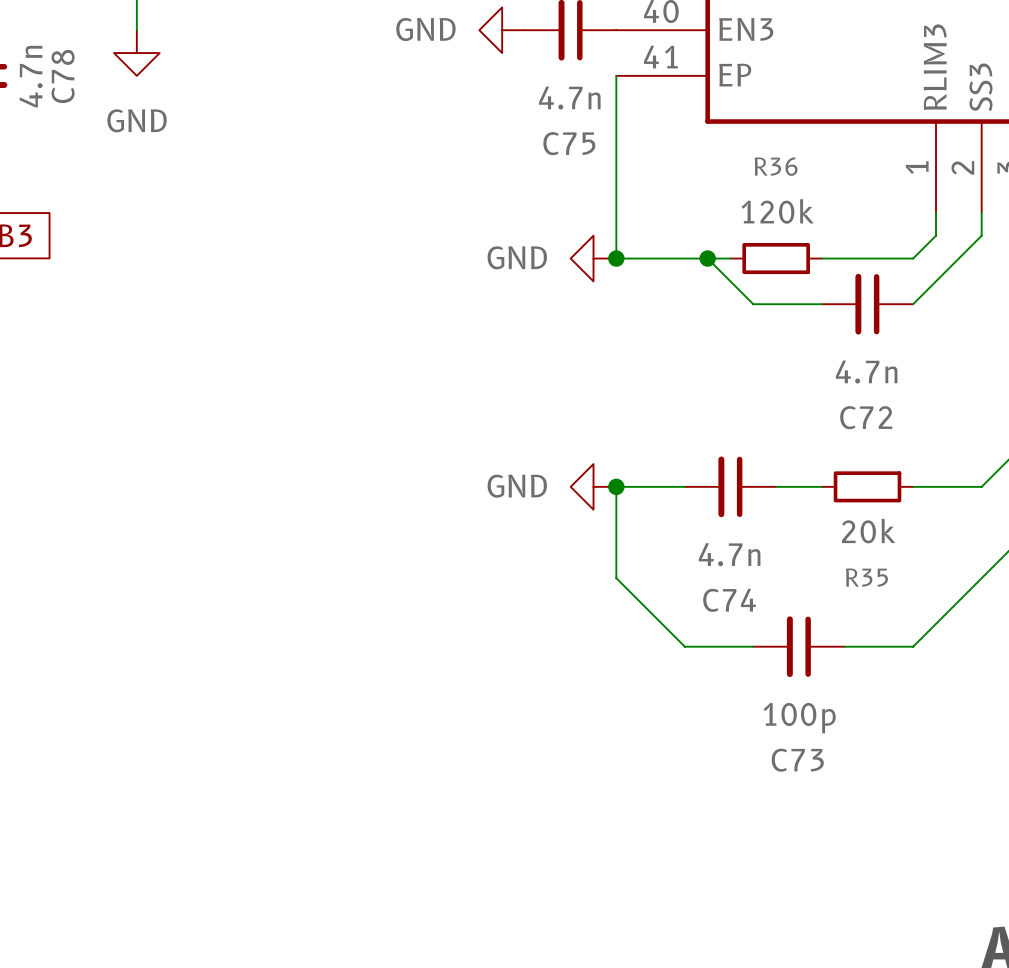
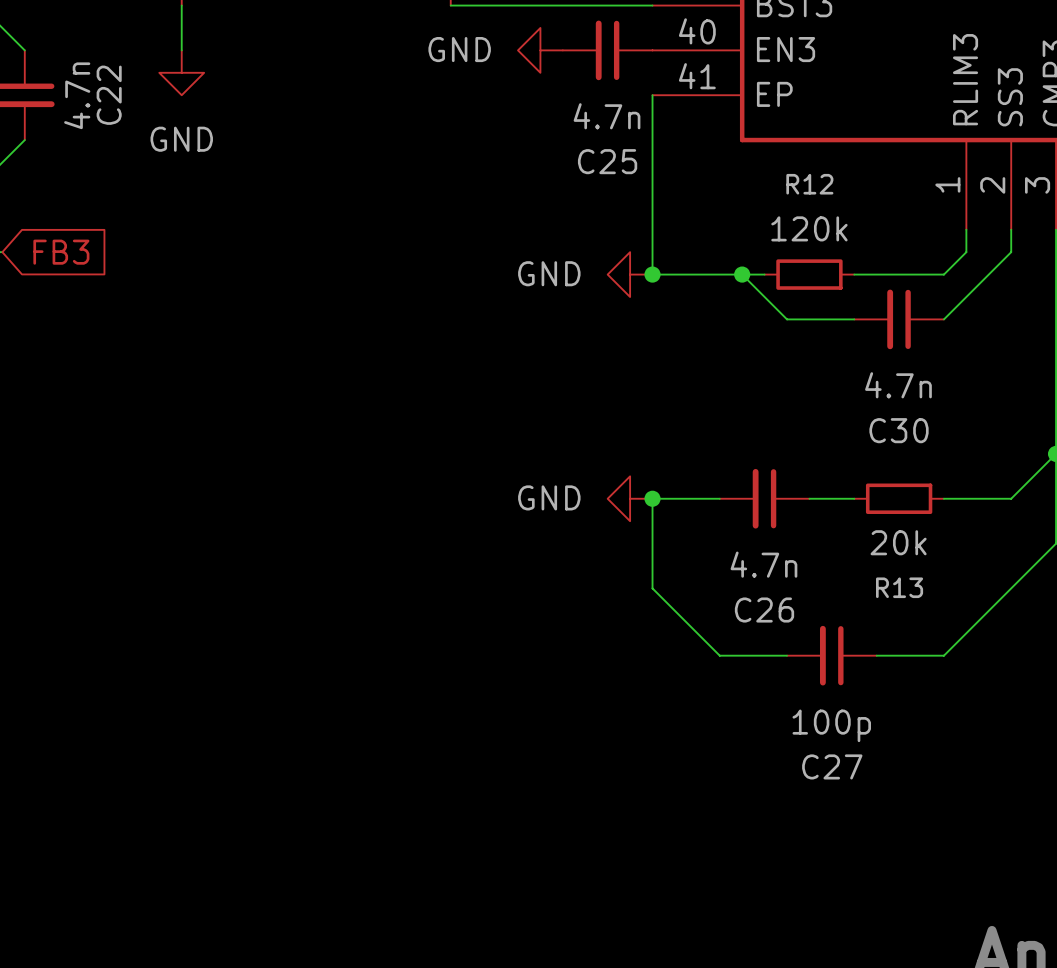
C78 name: C78 (63, 76) -> C22 (109, 95)
C75 name: C75 (569, 143) -> C25 (607, 161)
R36 name: R36 (776, 166) -> R12 (809, 184)
C72 name: C72 (866, 417) -> C30 (899, 430)
R35 name: R35 (866, 577) -> R13 (899, 587)
C74 name: C74 (729, 600) -> C26 (764, 610)
C73 name: C73 (797, 760) -> C27 (832, 766)

